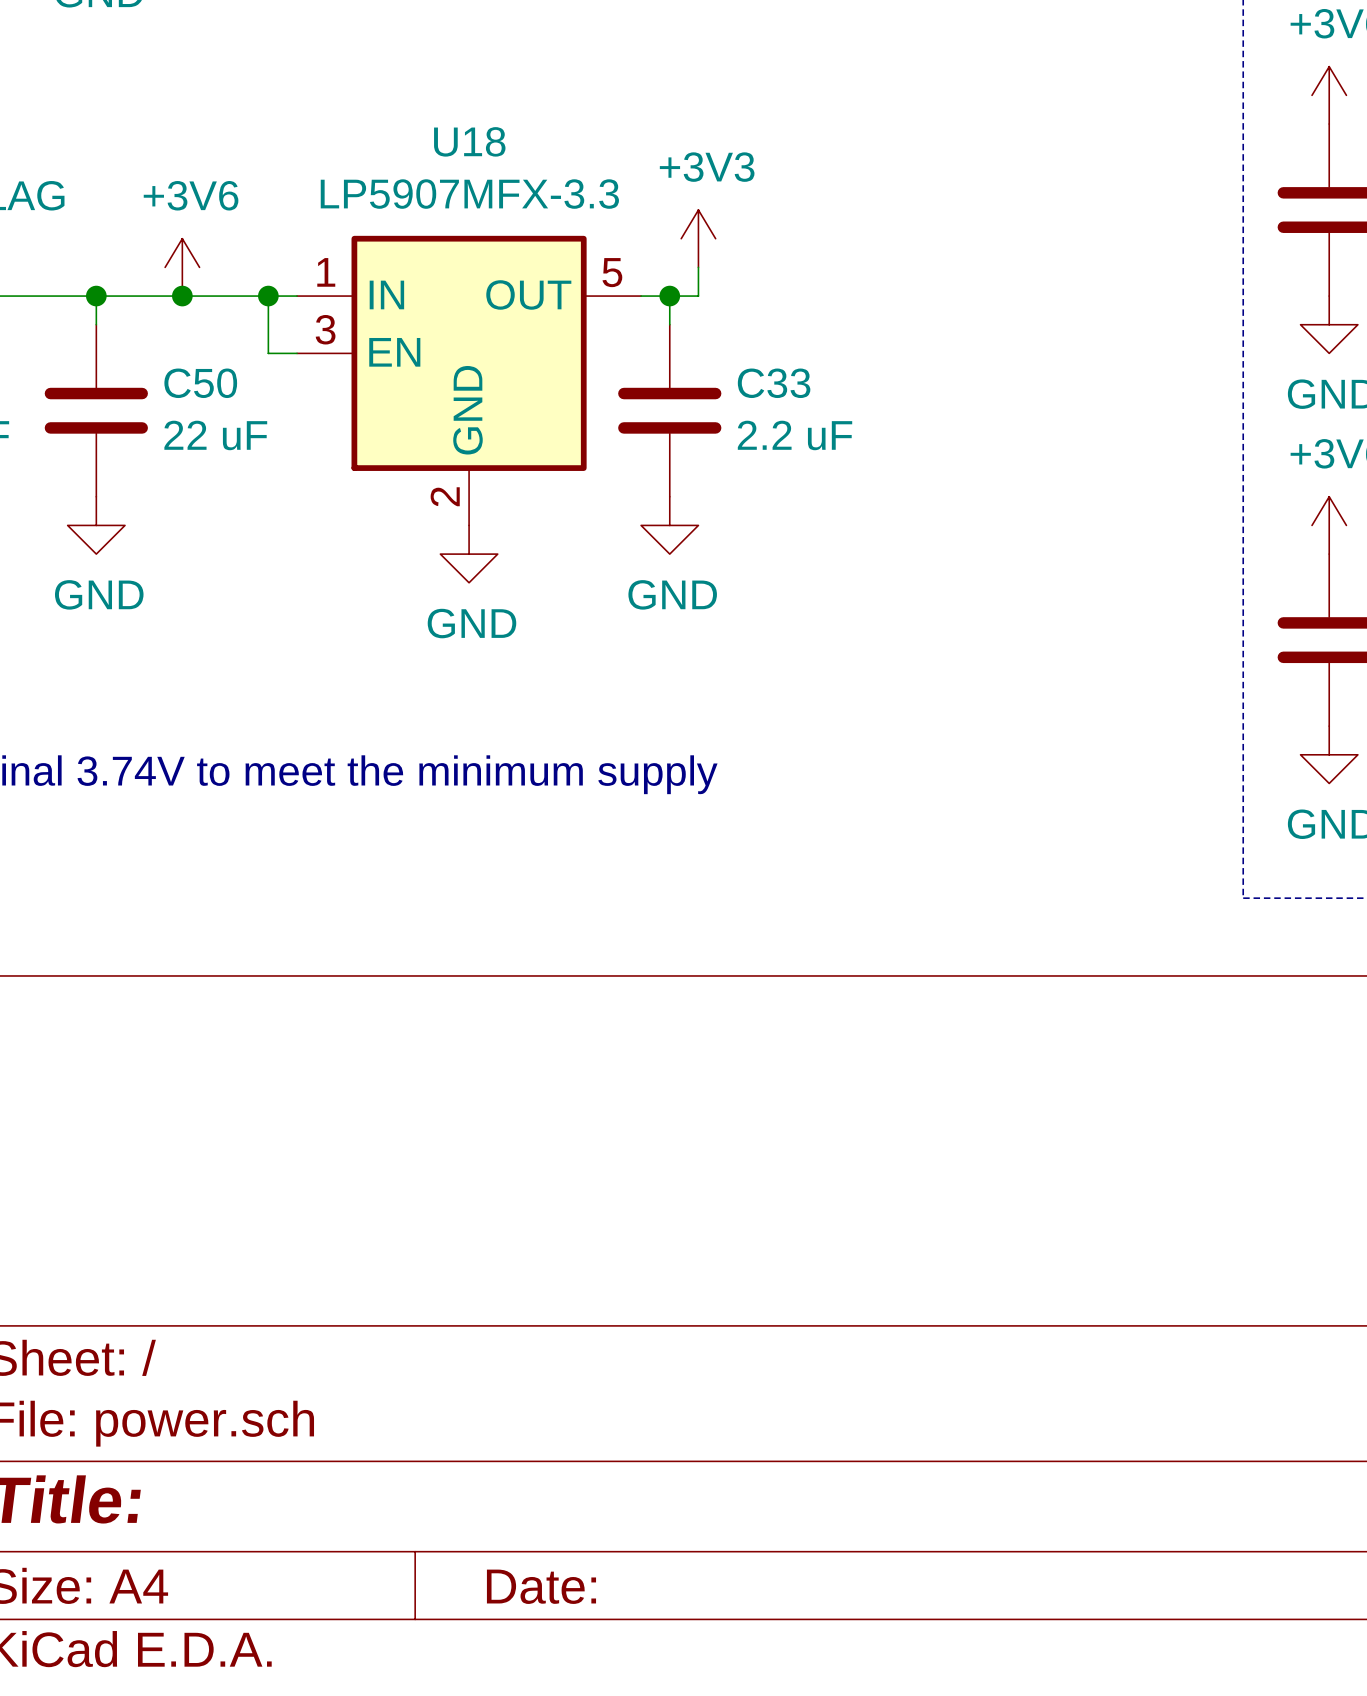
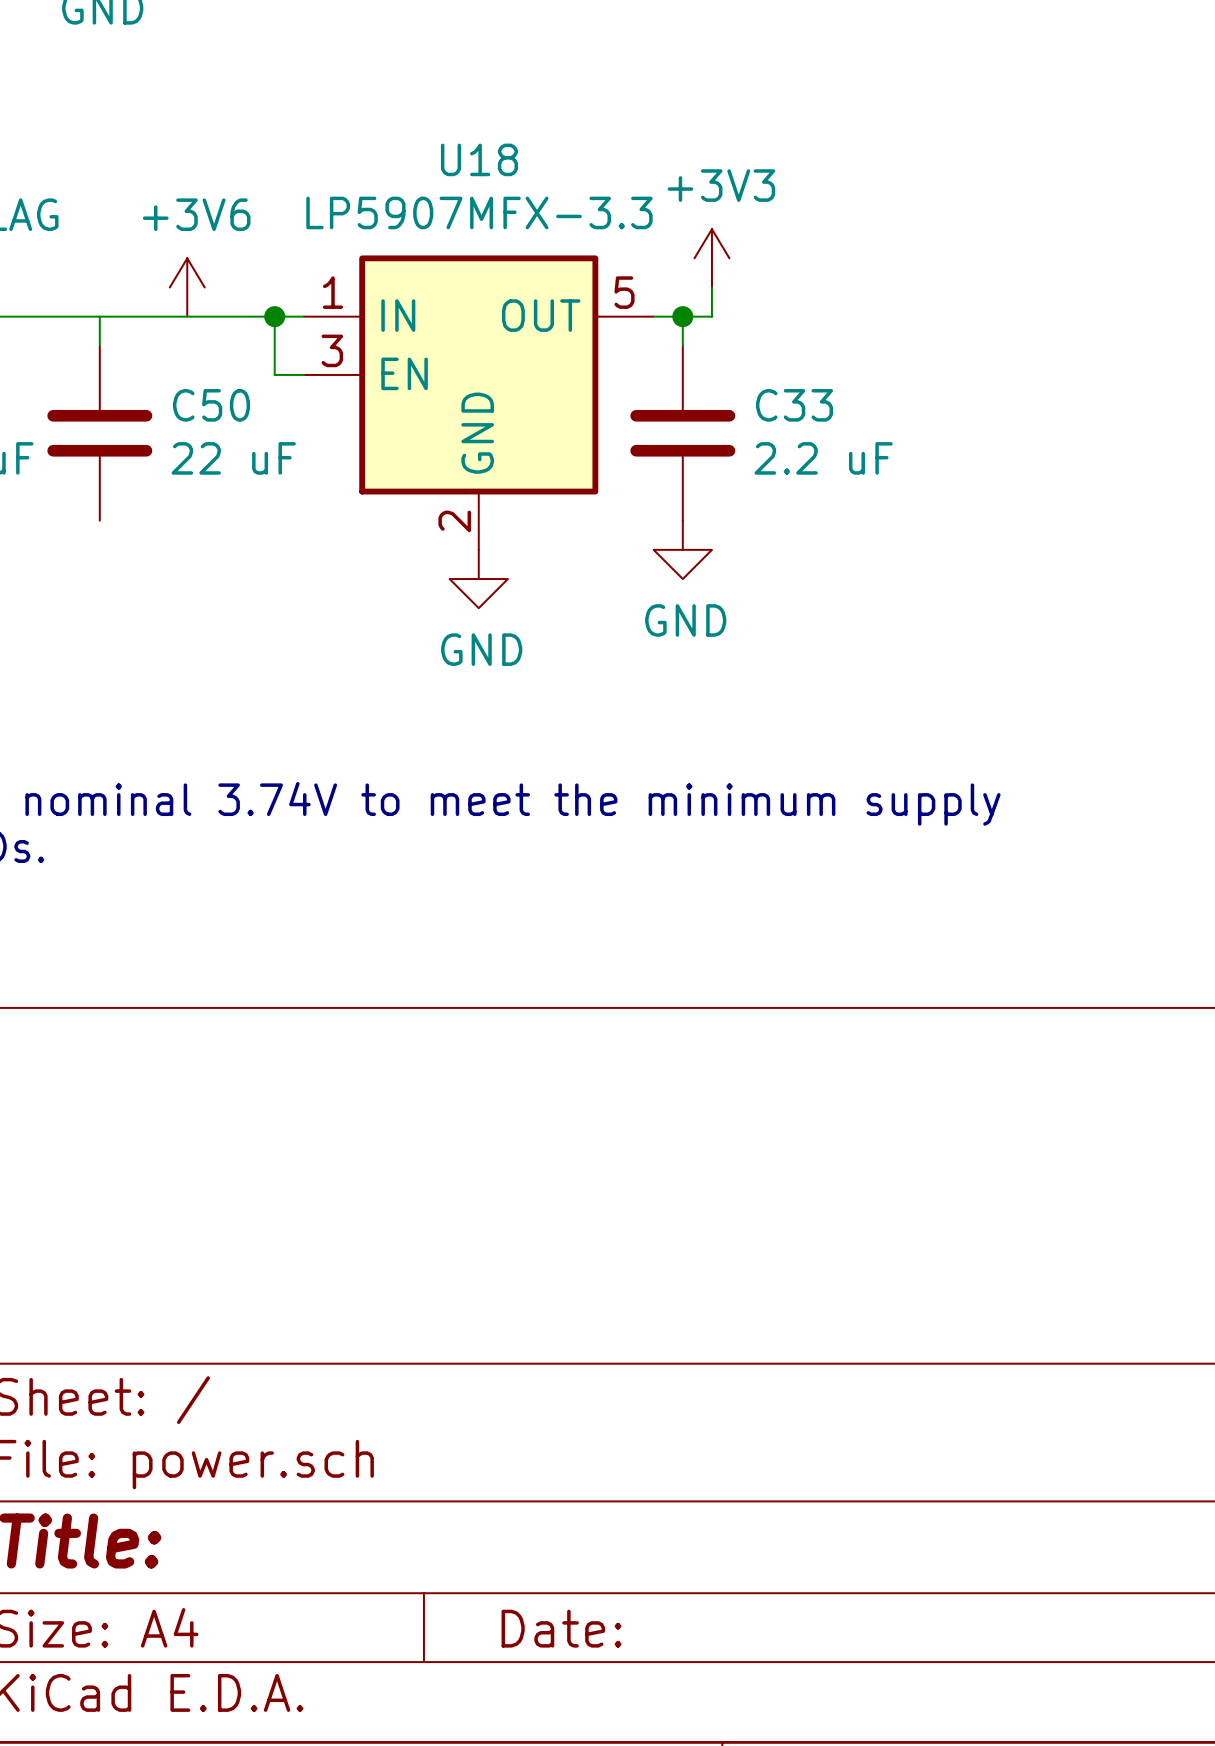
junction: (96, 296) -> none
junction: (182, 296) -> none
power symbol: GND (96, 525) -> none

